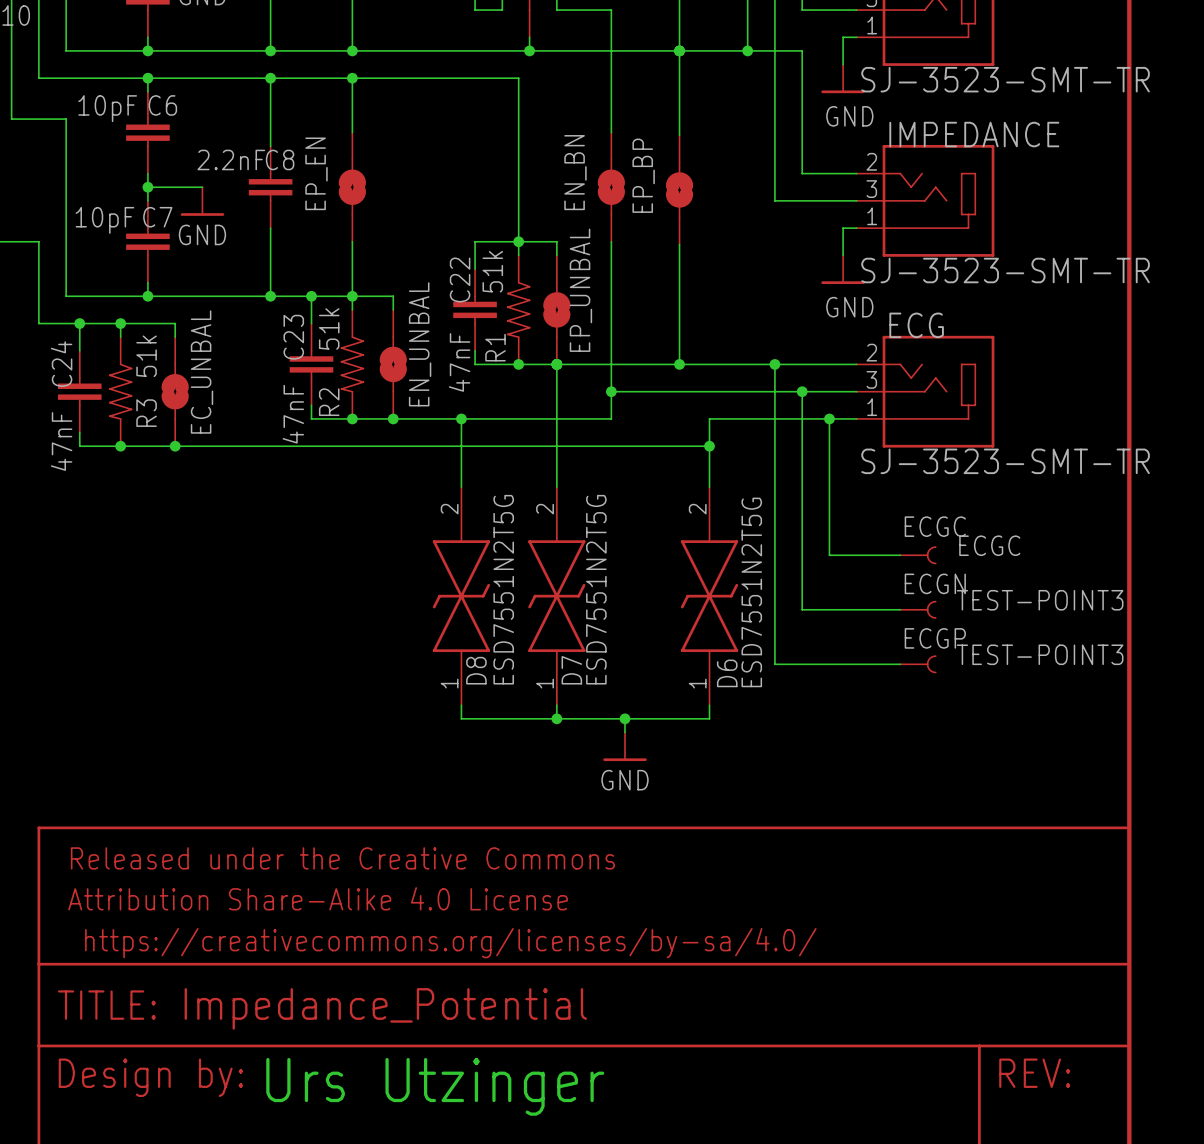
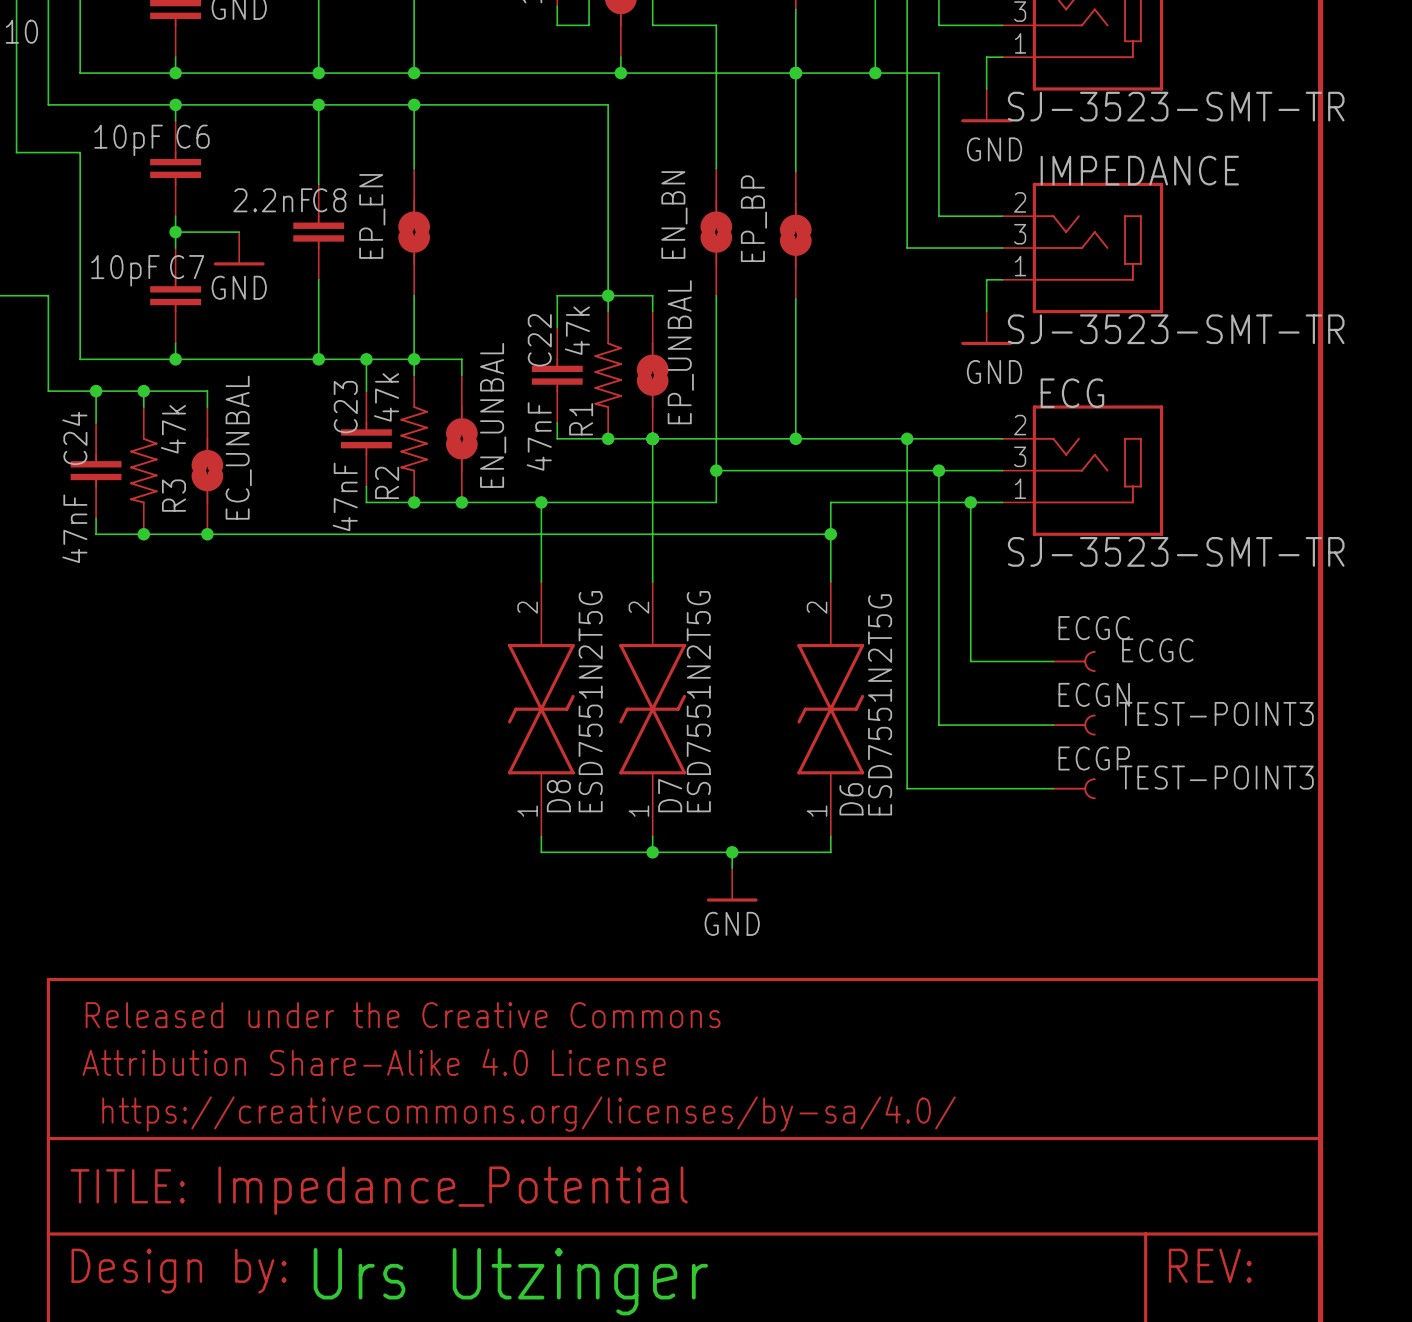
R1 value: 51k (492, 271) -> 47k (577, 330)
R2 value: 51k (329, 328) -> 47k (386, 397)
R3 value: 51k (146, 356) -> 47k (173, 429)

